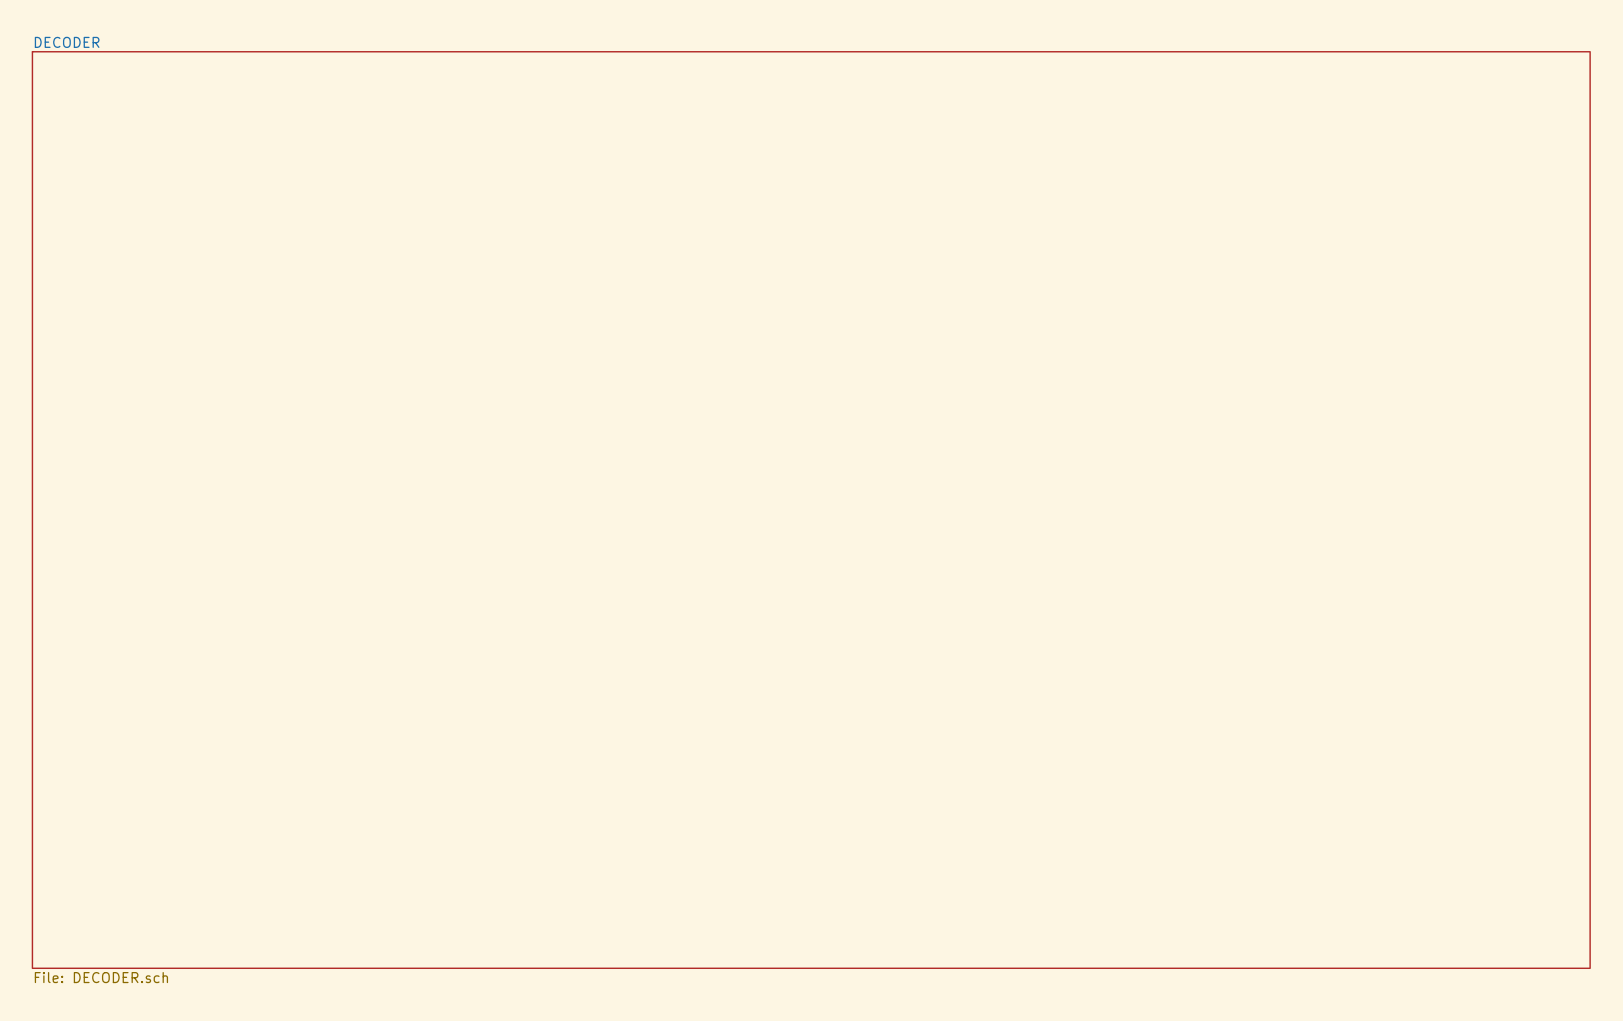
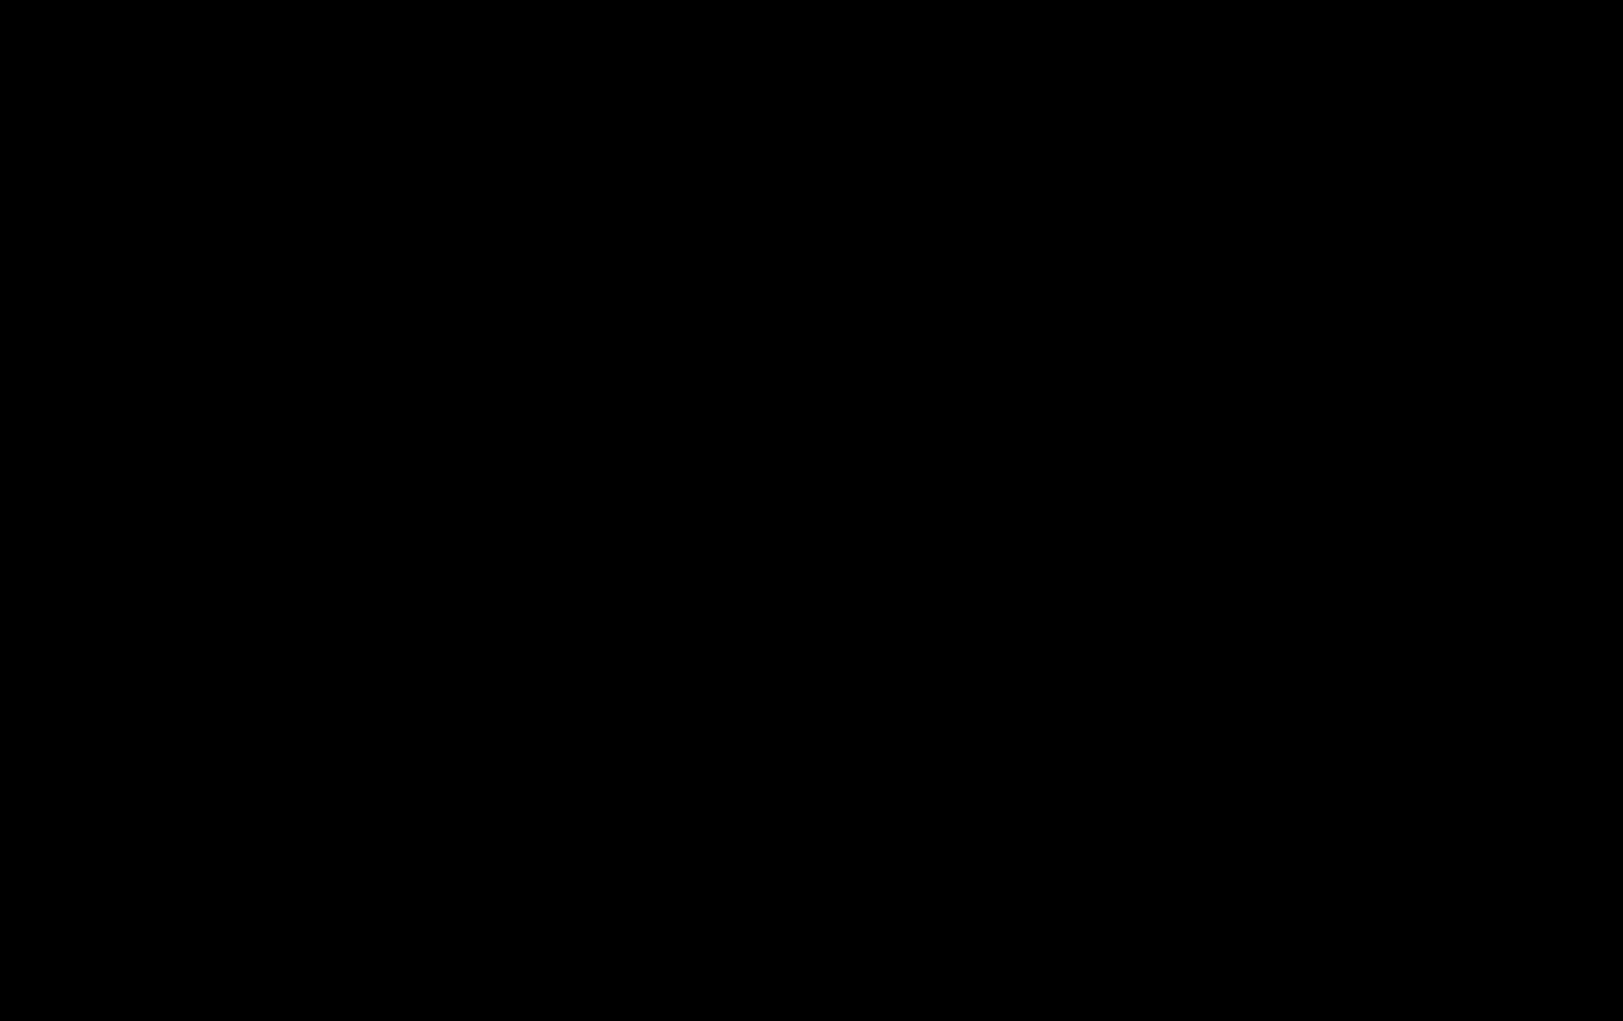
sheet DECODER: File: DECODER.sch (811, 510) -> none

